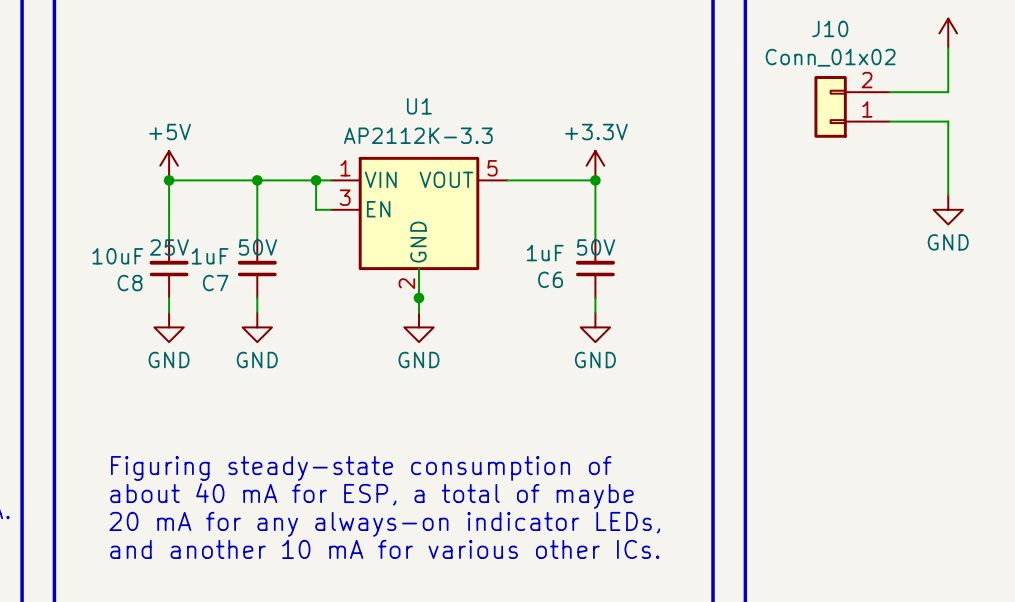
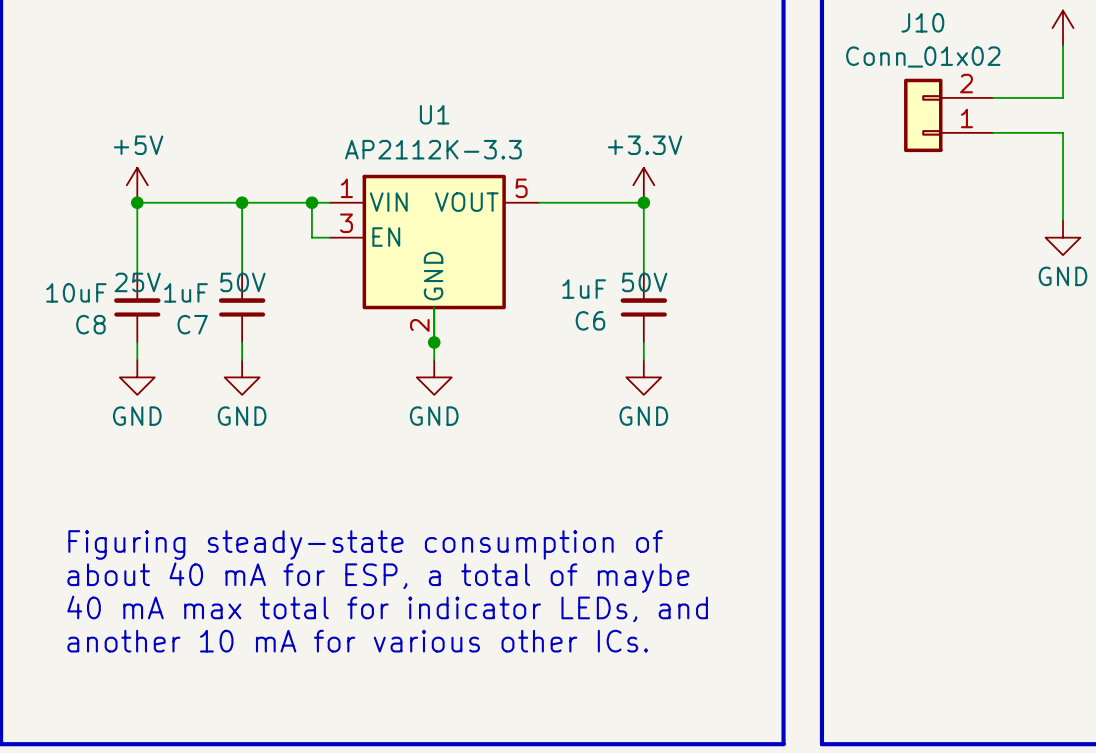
text: 20 mA for any always-on indicator LEDs, (384, 524) -> 40 mA max total for indicator LEDs, and (387, 608)
text: and another 10 mA for various other ICs. (384, 549) -> another 10 mA for various other ICs. (357, 641)

